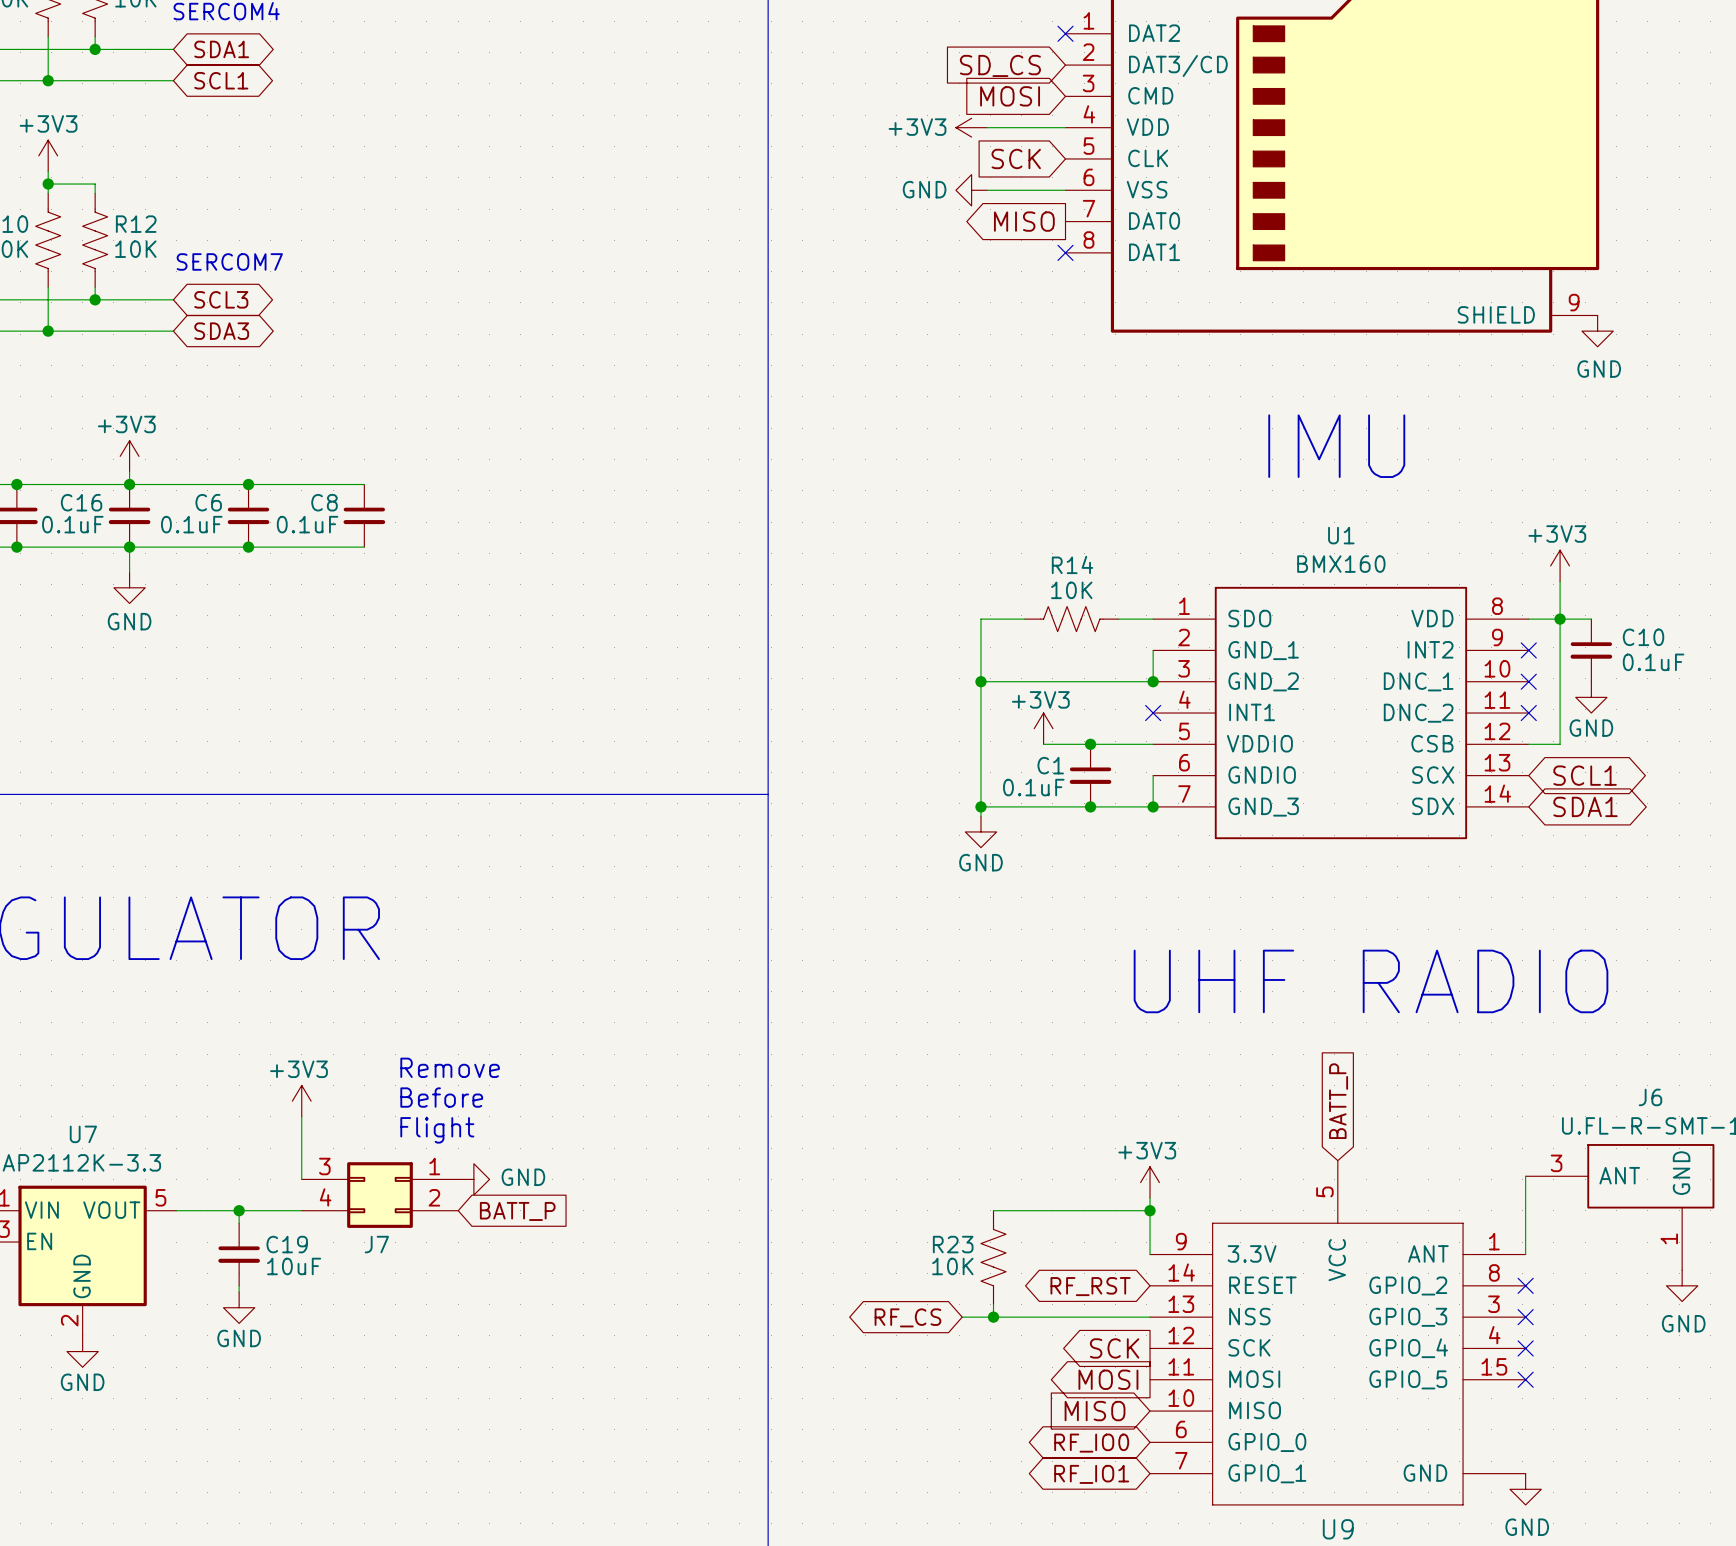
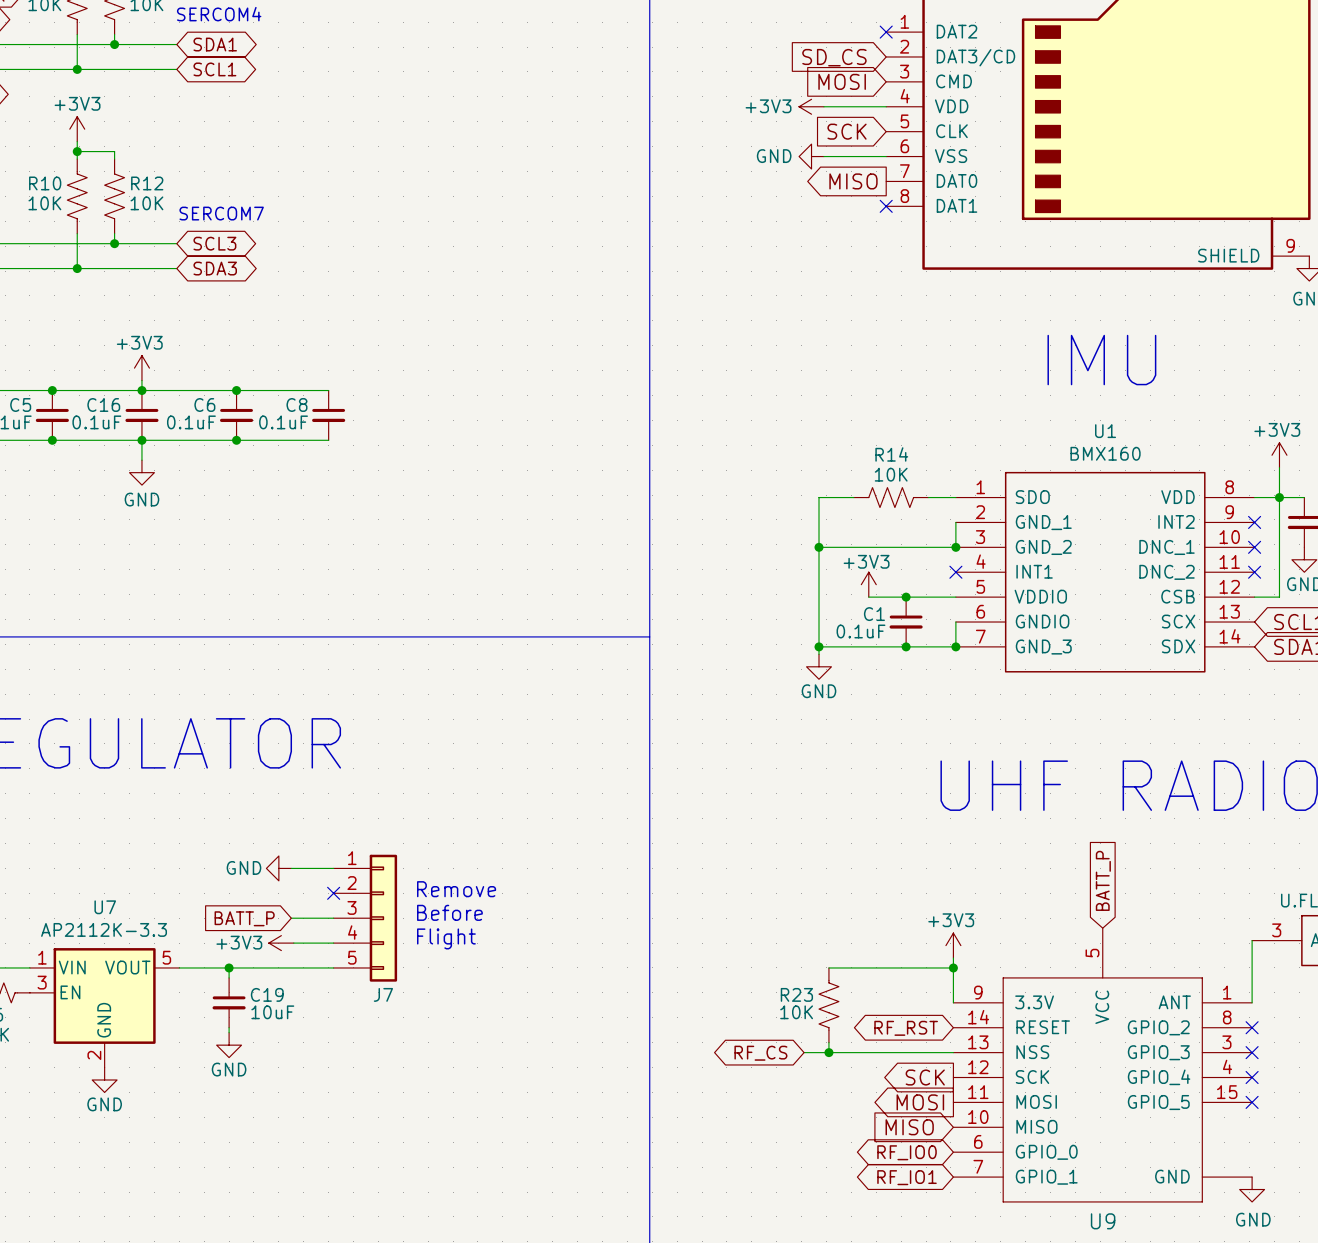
text position: Remove (450, 1067) -> Remove (456, 889)
wire: none -> (291, 868) (333, 868)
text position: Before (441, 1097) -> Before (449, 912)
power symbol rotation: 0° (301, 1101) -> 90° counterclockwise (281, 943)
power symbol position: +3V3 (301, 1101) -> +3V3 (281, 943)
wire: (301, 1116) (301, 1179) -> none
no-connect mark: none -> (333, 893)
text position: Flight (437, 1130) -> Flight (446, 938)
wire: none -> (291, 918) (333, 918)
J7 symbol: [301, 1162, 459, 1228] -> [333, 854, 398, 982]
power symbol rotation: 0° (473, 1179) -> 180° (278, 868)
power symbol position: GND (473, 1179) -> GND (278, 868)
global label rotation: 0° (517, 1211) -> 180° (244, 918)
global label position: BATT_P (517, 1211) -> BATT_P (244, 918)
J7 name position: J7 (376, 1244) -> J7 (383, 994)

